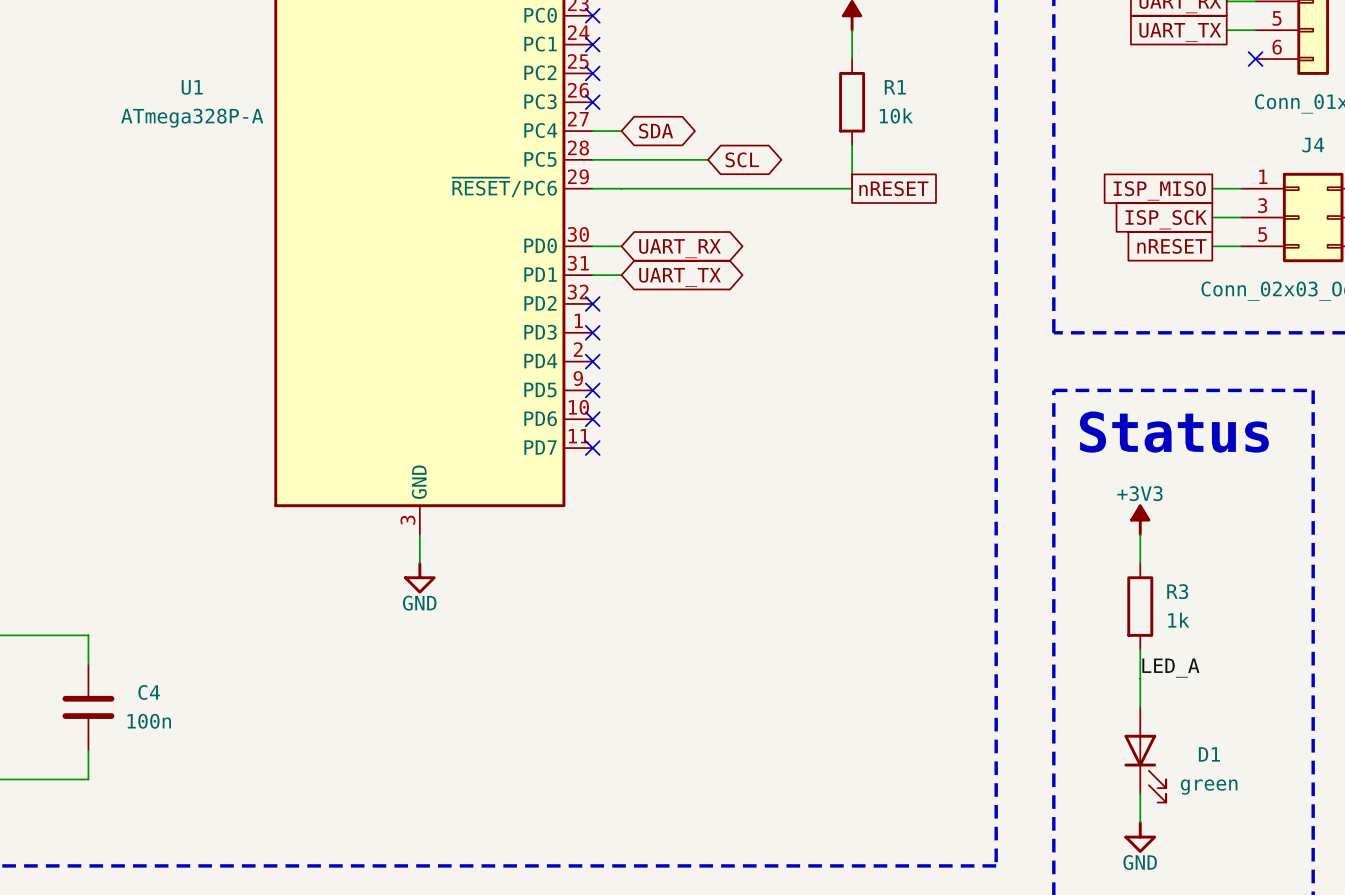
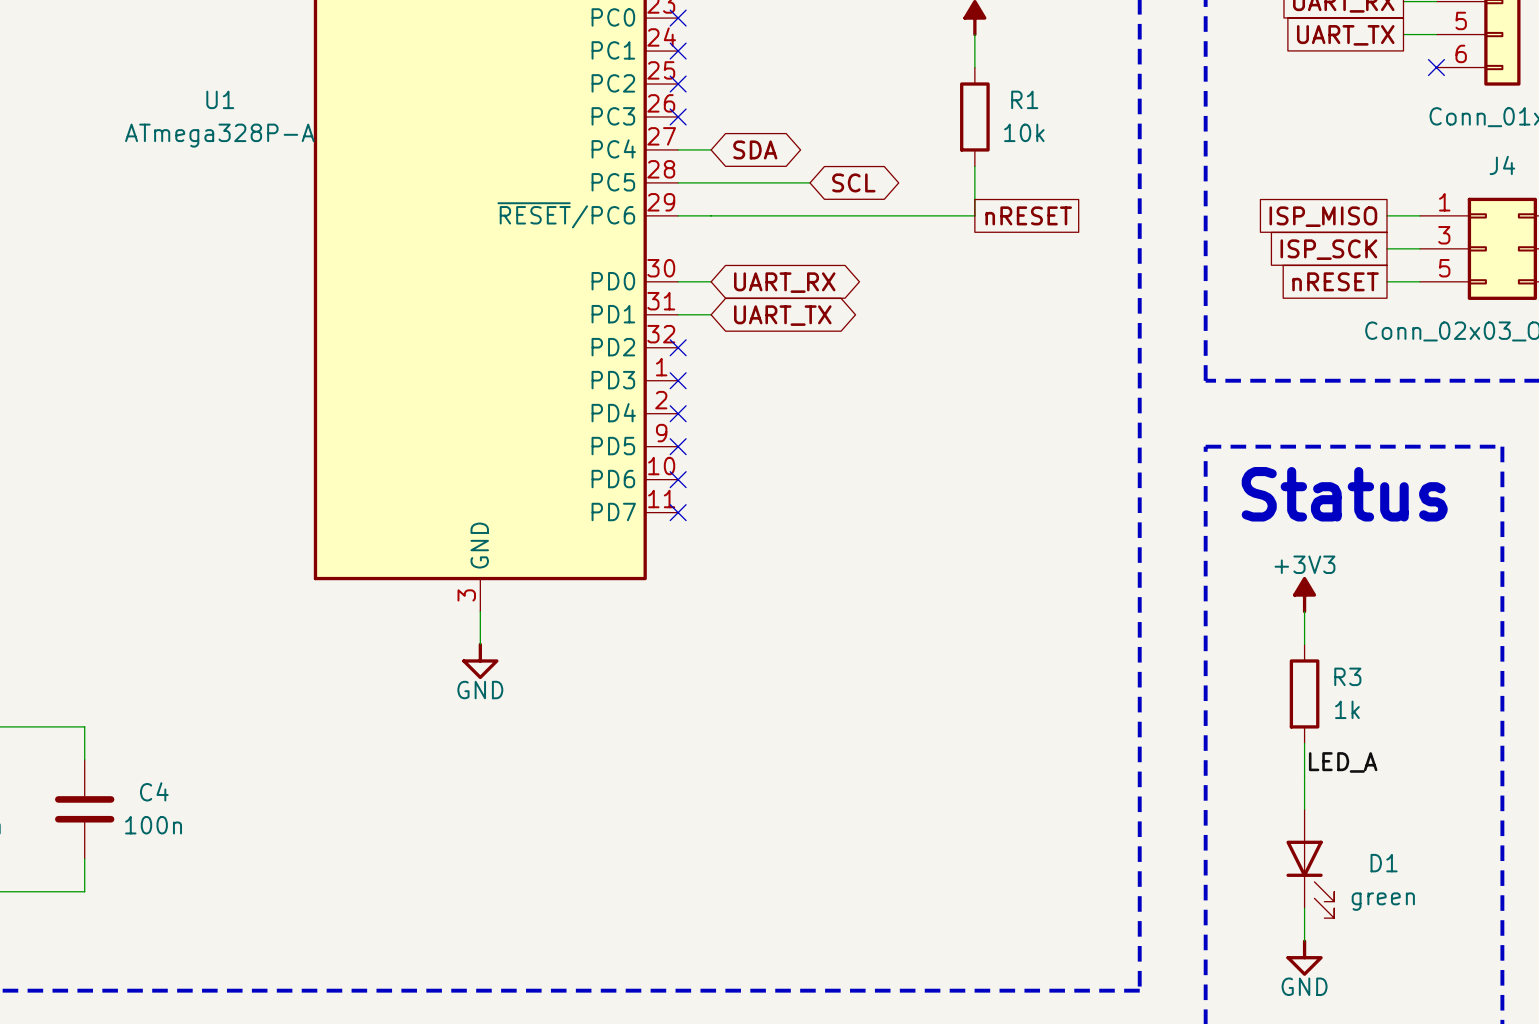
wire: (74, 635) (88, 635) (88, 664) -> (84, 726) (84, 759)
C4 position: (88, 707) -> (84, 809)
wire: (88, 750) (88, 779) (74, 779) -> (84, 858) (84, 891)

